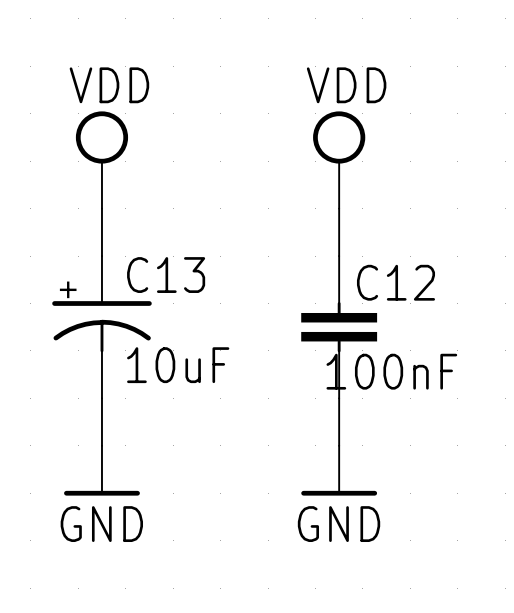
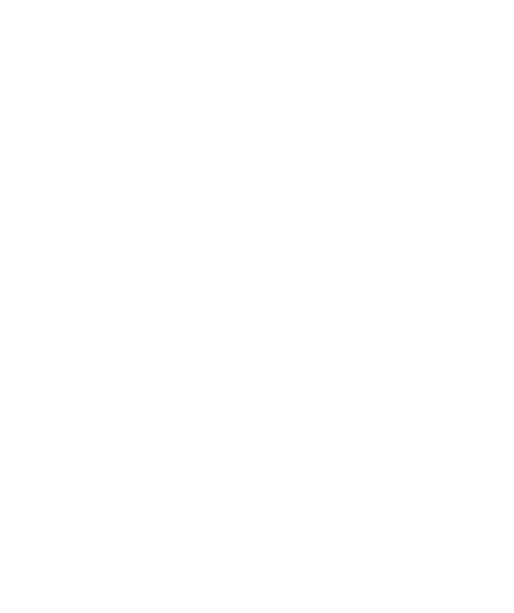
power symbol: VDD (101, 160) -> none
power symbol: VDD (339, 160) -> none
wire: (101, 208) (101, 256) -> none
wire: (339, 208) (339, 256) -> none
C13: 10uF (101, 327) -> none
C12: 100nF (339, 327) -> none
wire: (101, 398) (101, 445) -> none
wire: (339, 398) (339, 445) -> none
power symbol: GND (101, 470) -> none
power symbol: GND (339, 470) -> none

